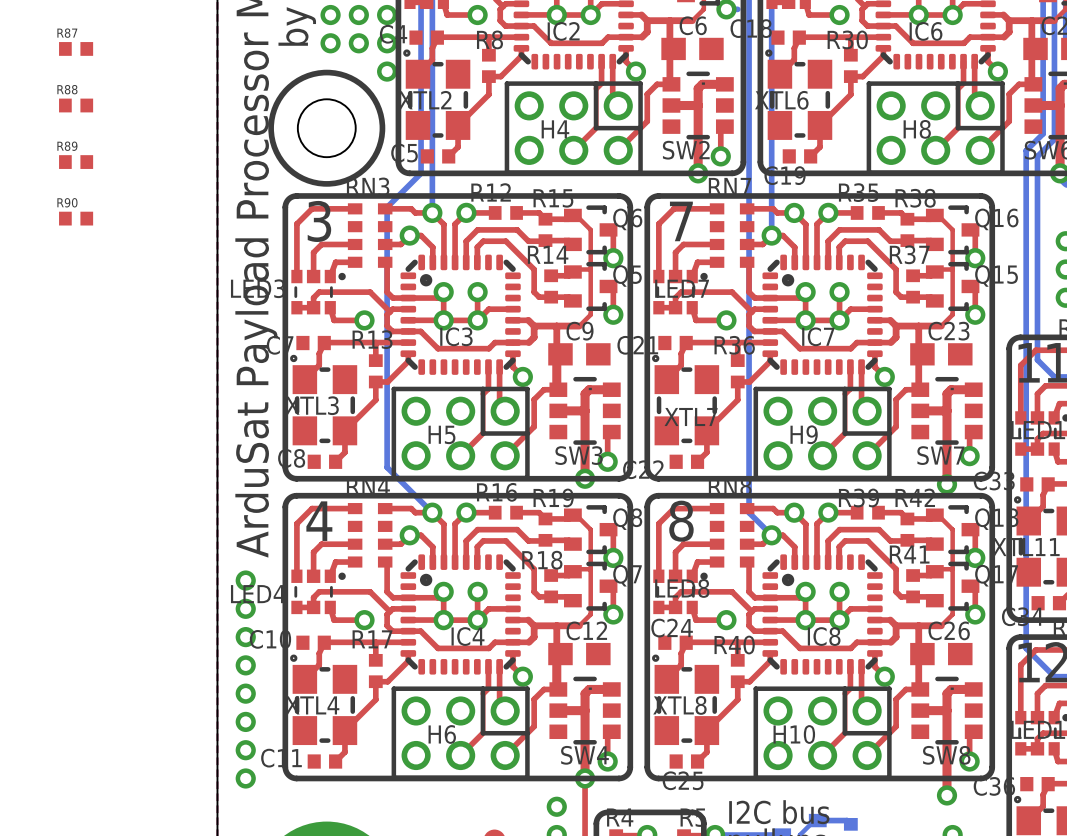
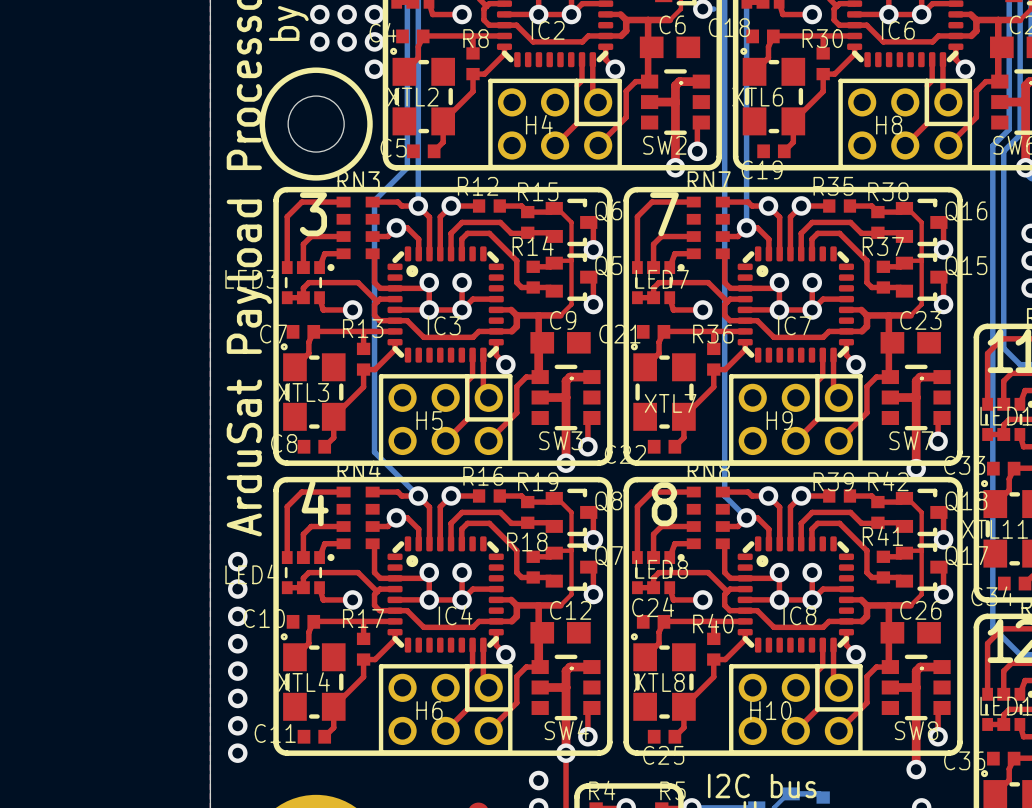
R87: (76, 48) -> none
R88: (76, 105) -> none
R89: (76, 162) -> none
R90: (76, 218) -> none

